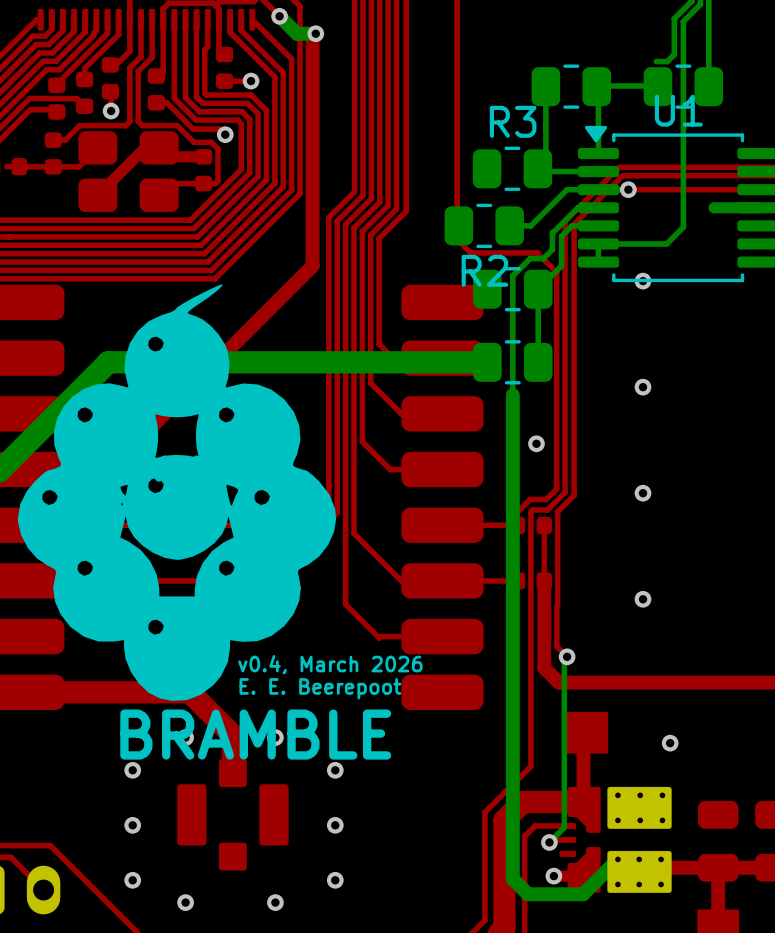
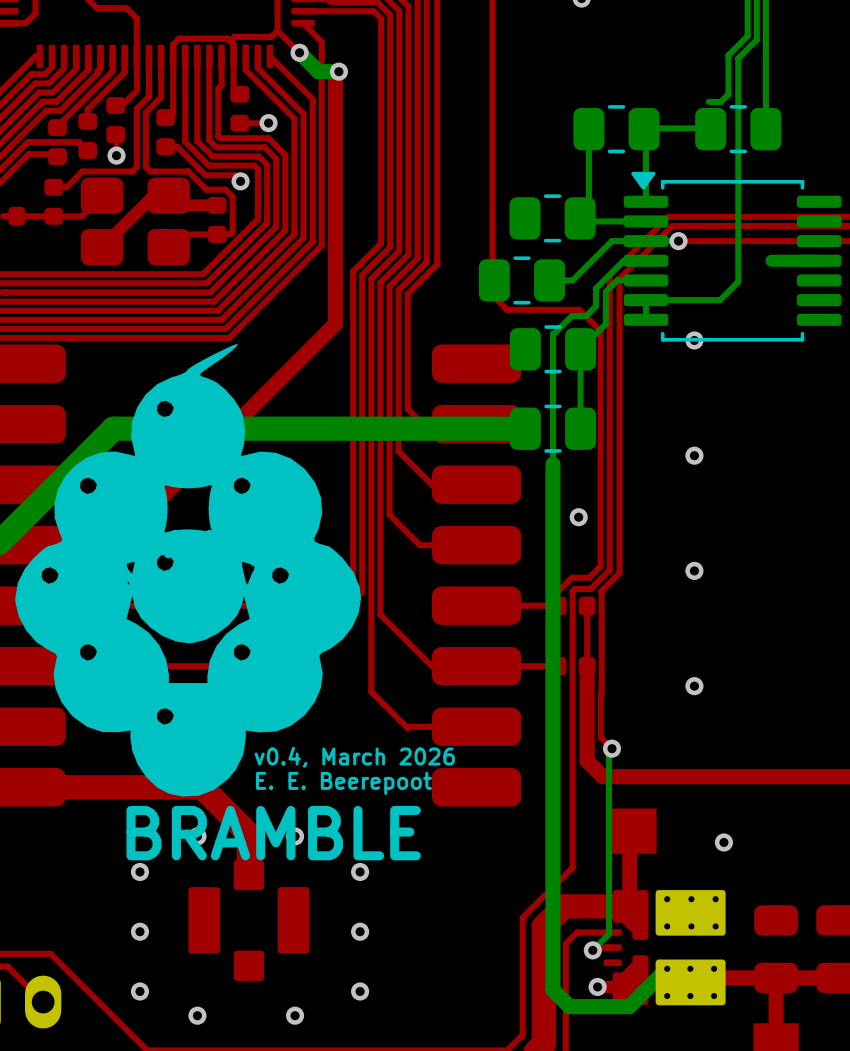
U1 name: U1 (678, 110) -> none
R3 name: R3 (513, 121) -> none
R2 name: R2 (484, 270) -> none

